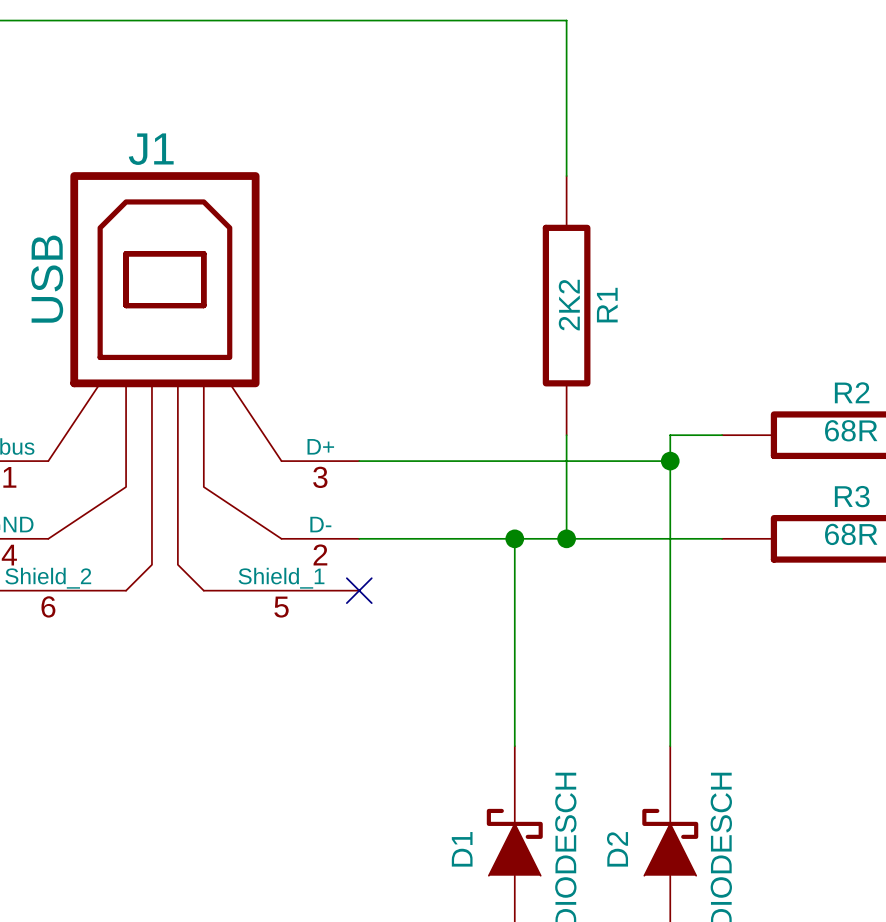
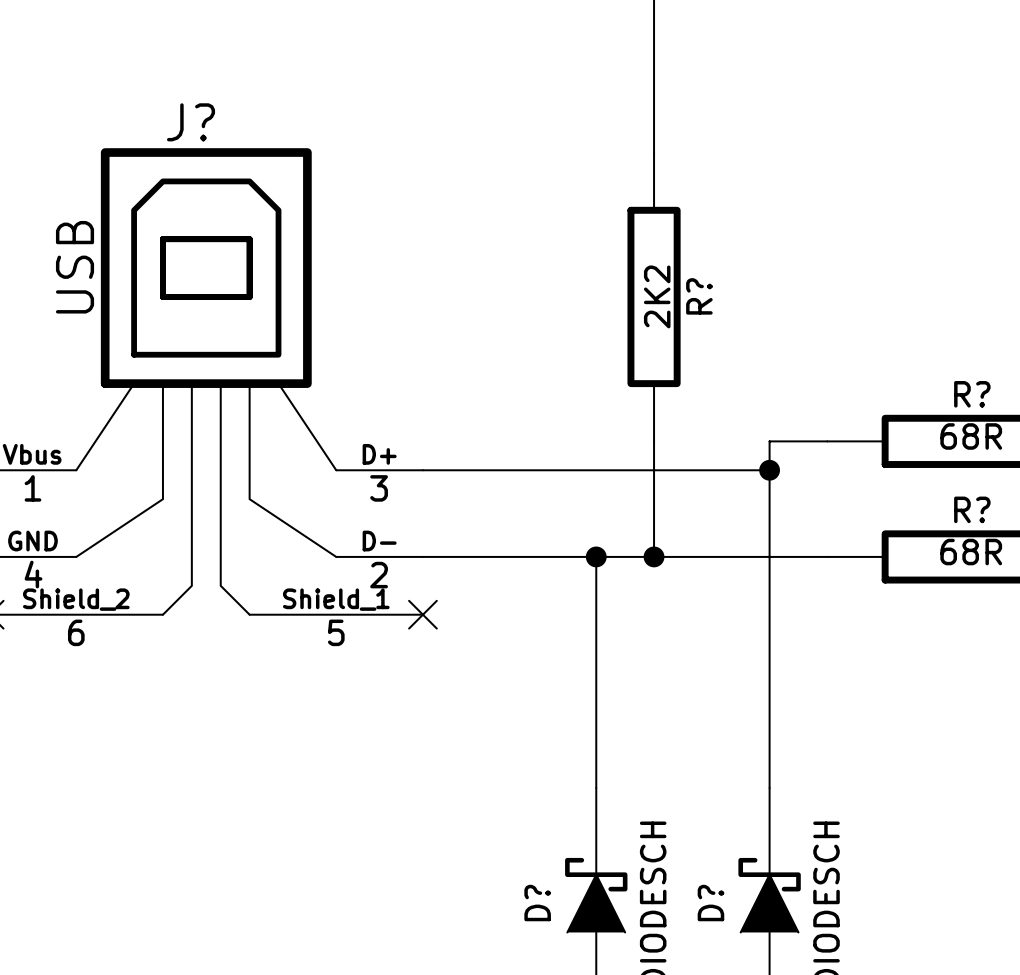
J1 name: J1 (151, 149) -> J? (191, 122)
R1 name: R1 (607, 305) -> R? (699, 296)
R2 name: R2 (852, 392) -> R? (972, 394)
R3 name: R3 (852, 496) -> R? (972, 509)
D1 name: D1 (462, 849) -> D? (537, 903)
D2 name: D2 (617, 849) -> D? (710, 903)

